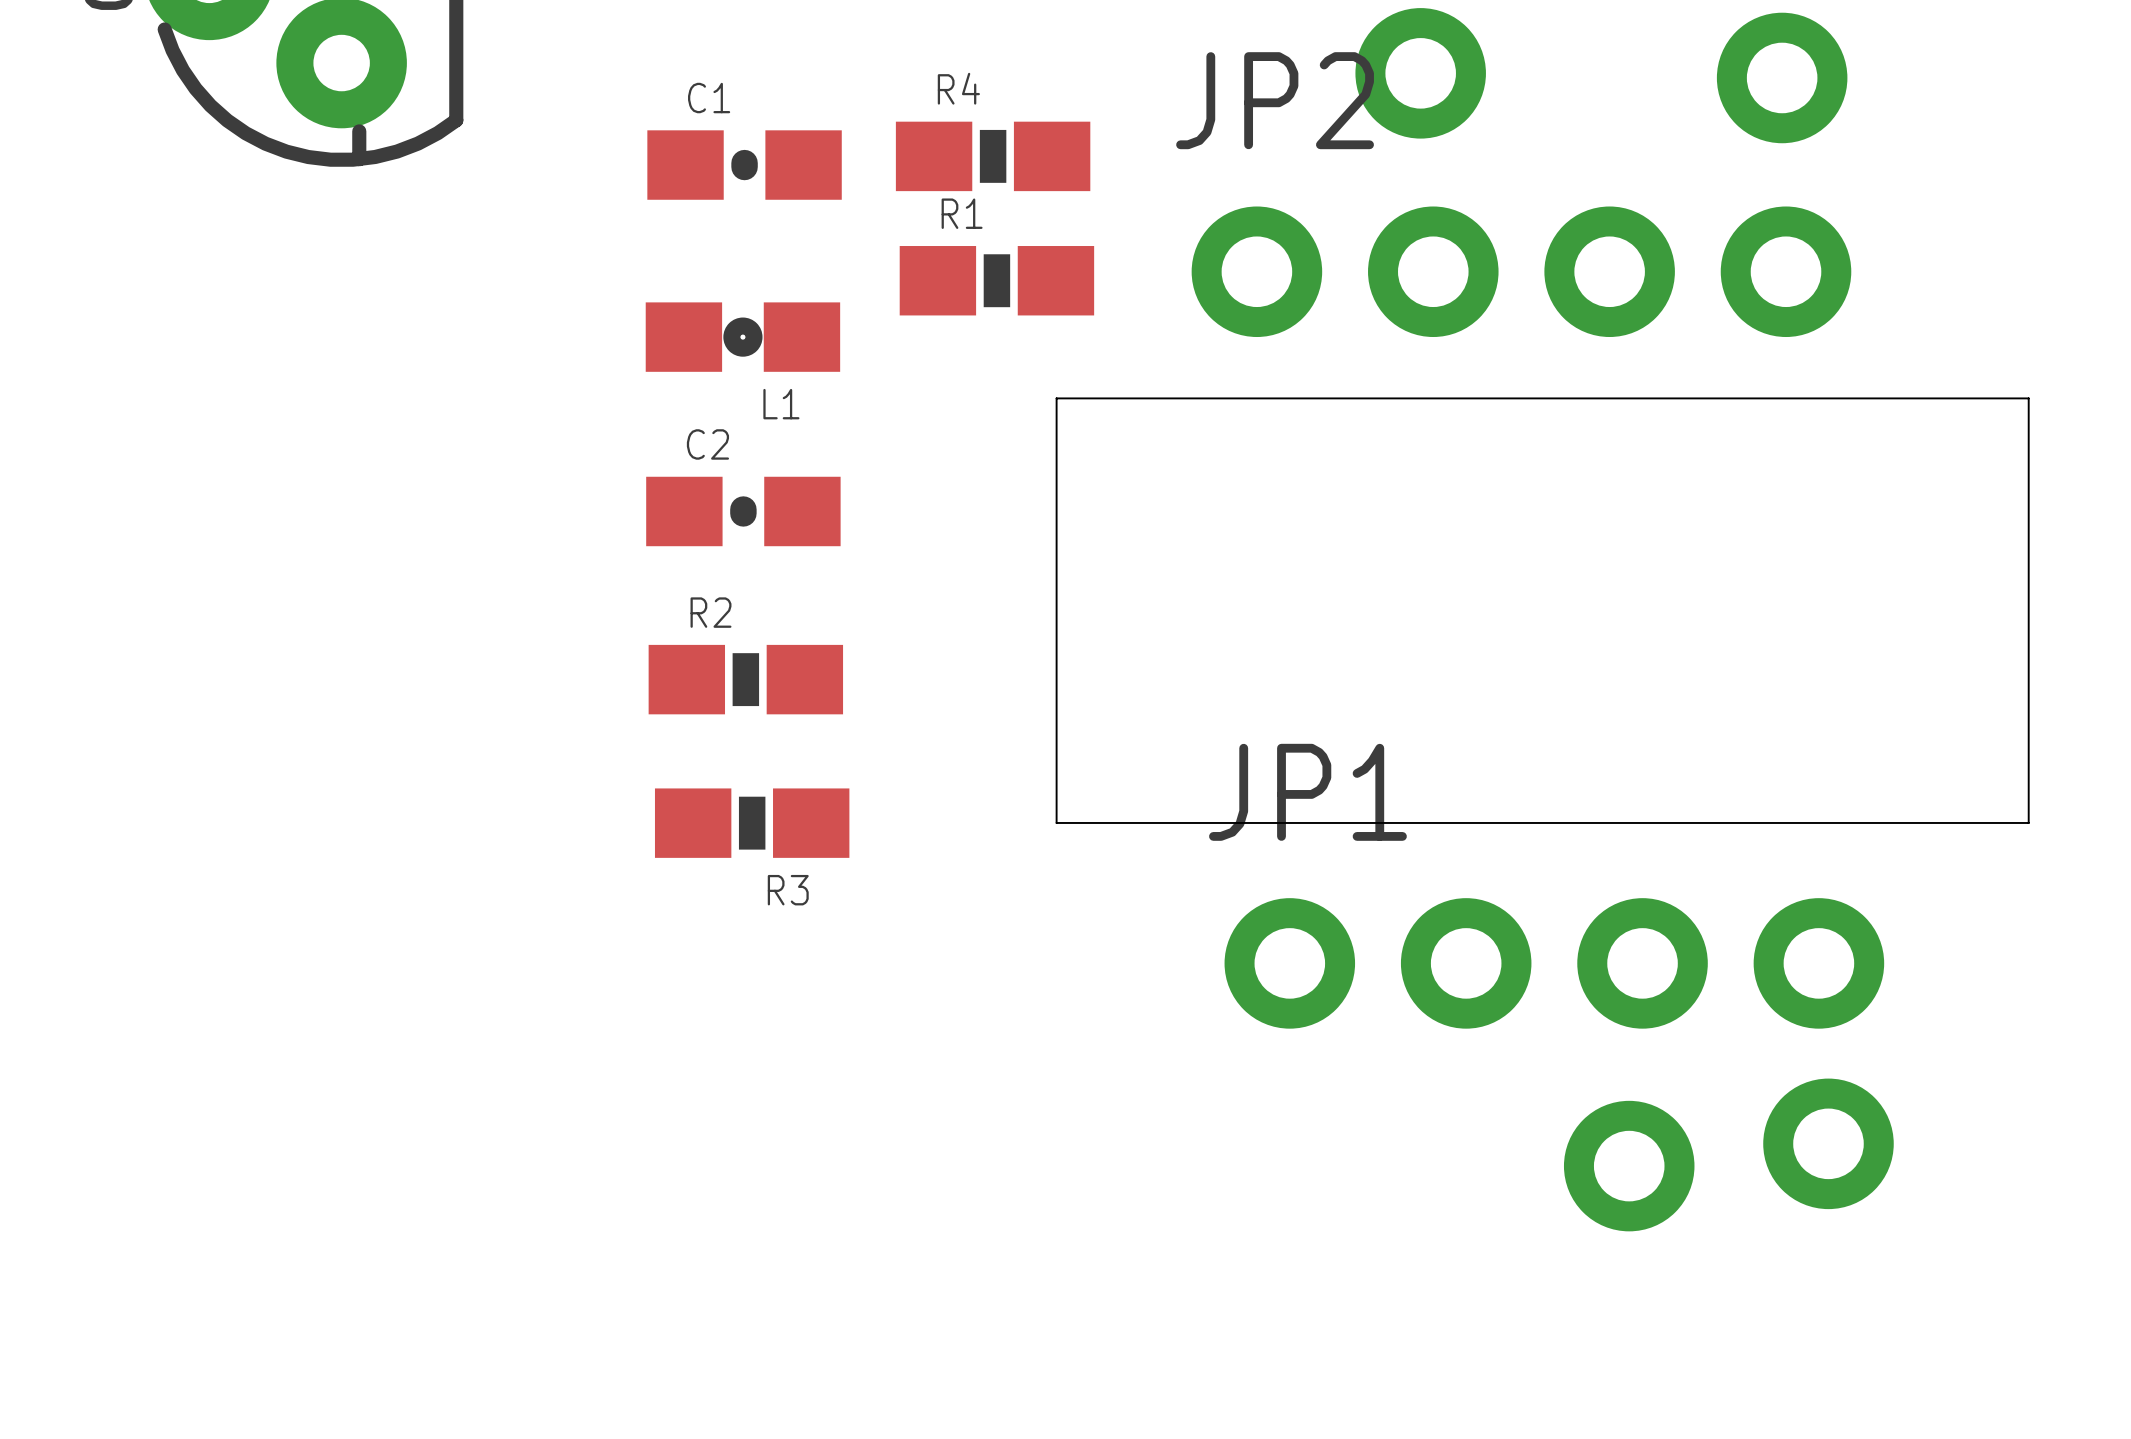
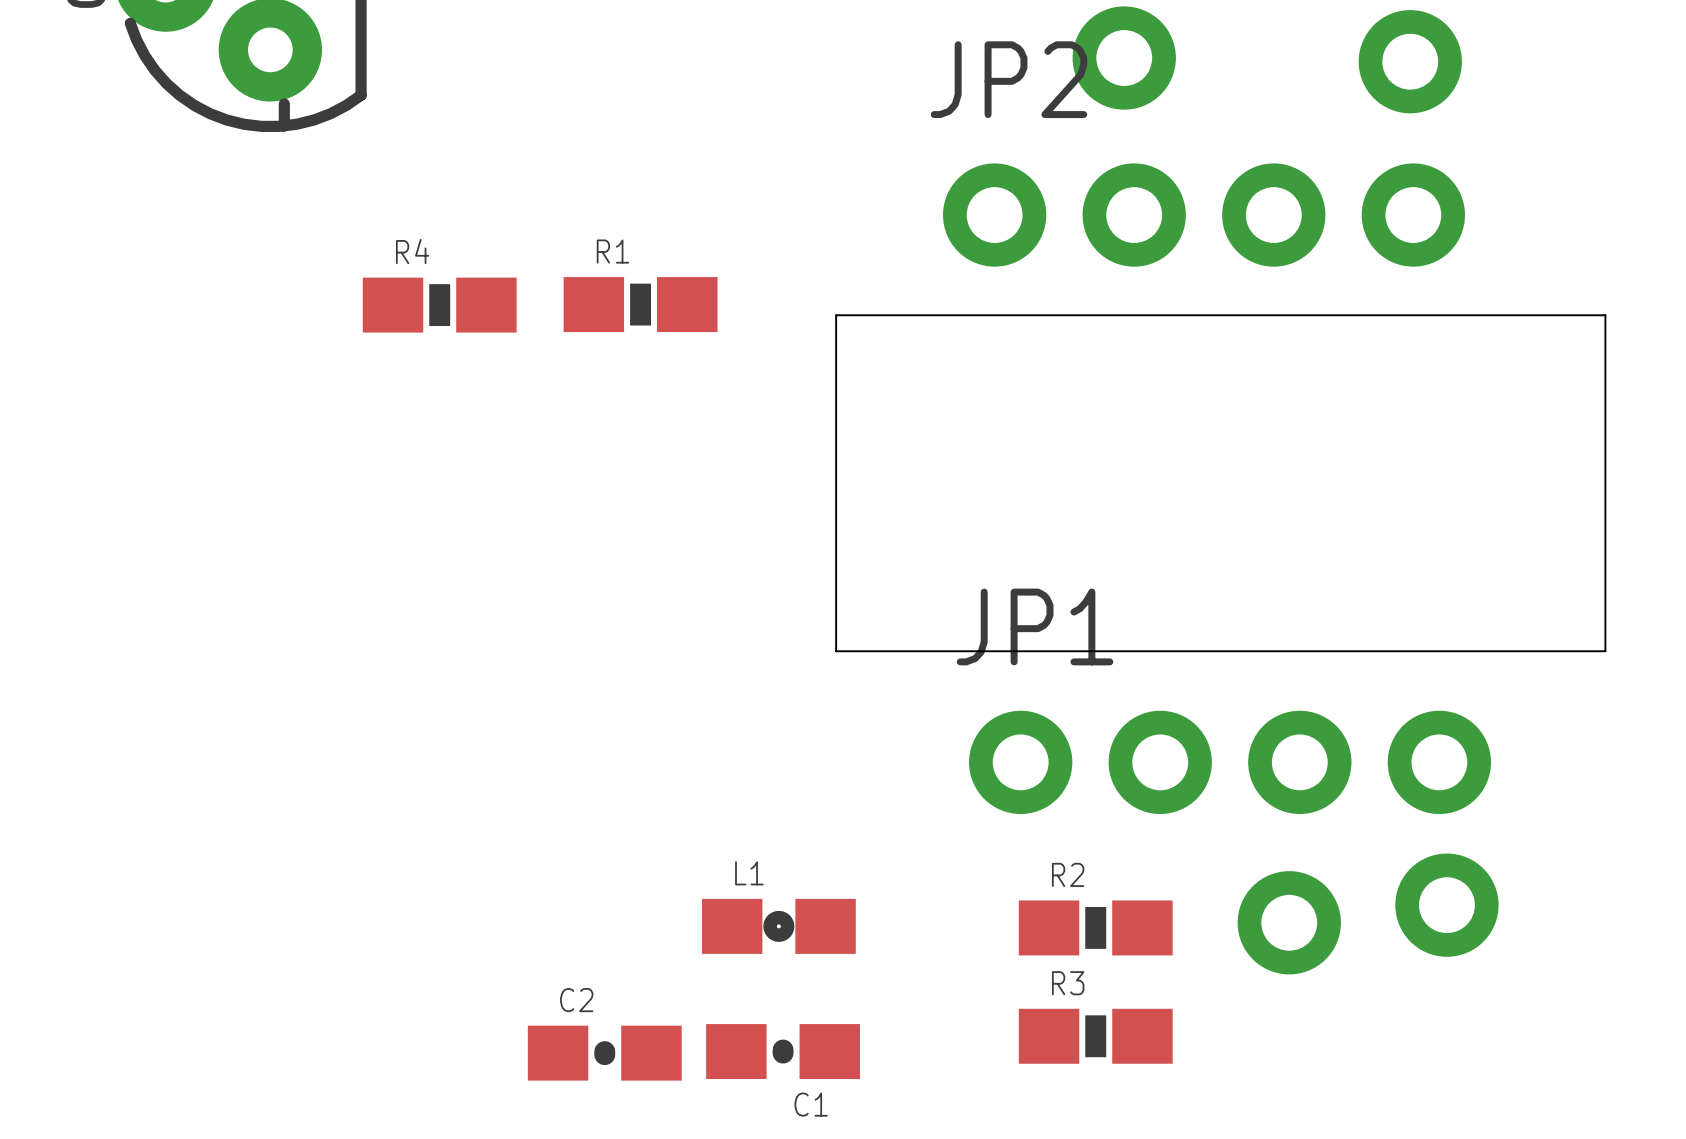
C1 name position: C1 (709, 98) -> C1 (811, 1104)
R4 position: (993, 156) -> (439, 305)
C1 position: (744, 165) -> (783, 1051)
R1 position: (996, 280) -> (640, 304)
L1 position: (742, 337) -> (778, 926)
L1 name position: L1 (781, 404) -> L1 (749, 873)
C2 position: (743, 511) -> (604, 1053)
R2 position: (745, 679) -> (1095, 927)
R3 position: (752, 823) -> (1095, 1036)
R3 name position: R3 (788, 890) -> R3 (1068, 983)

